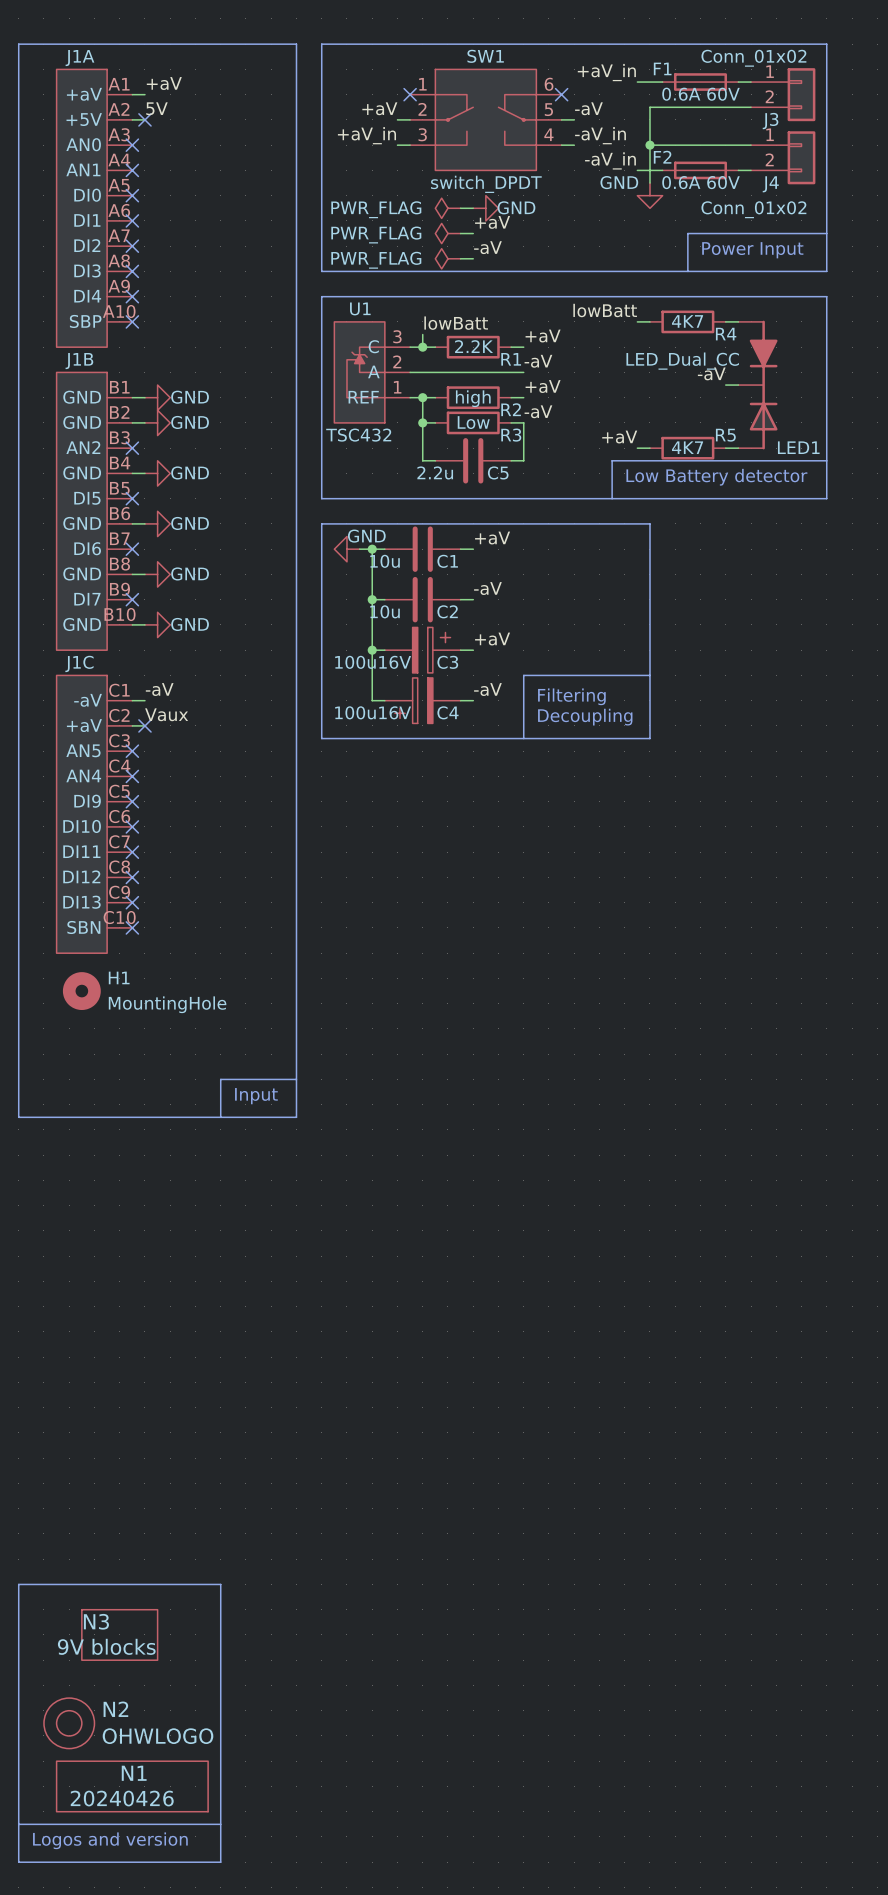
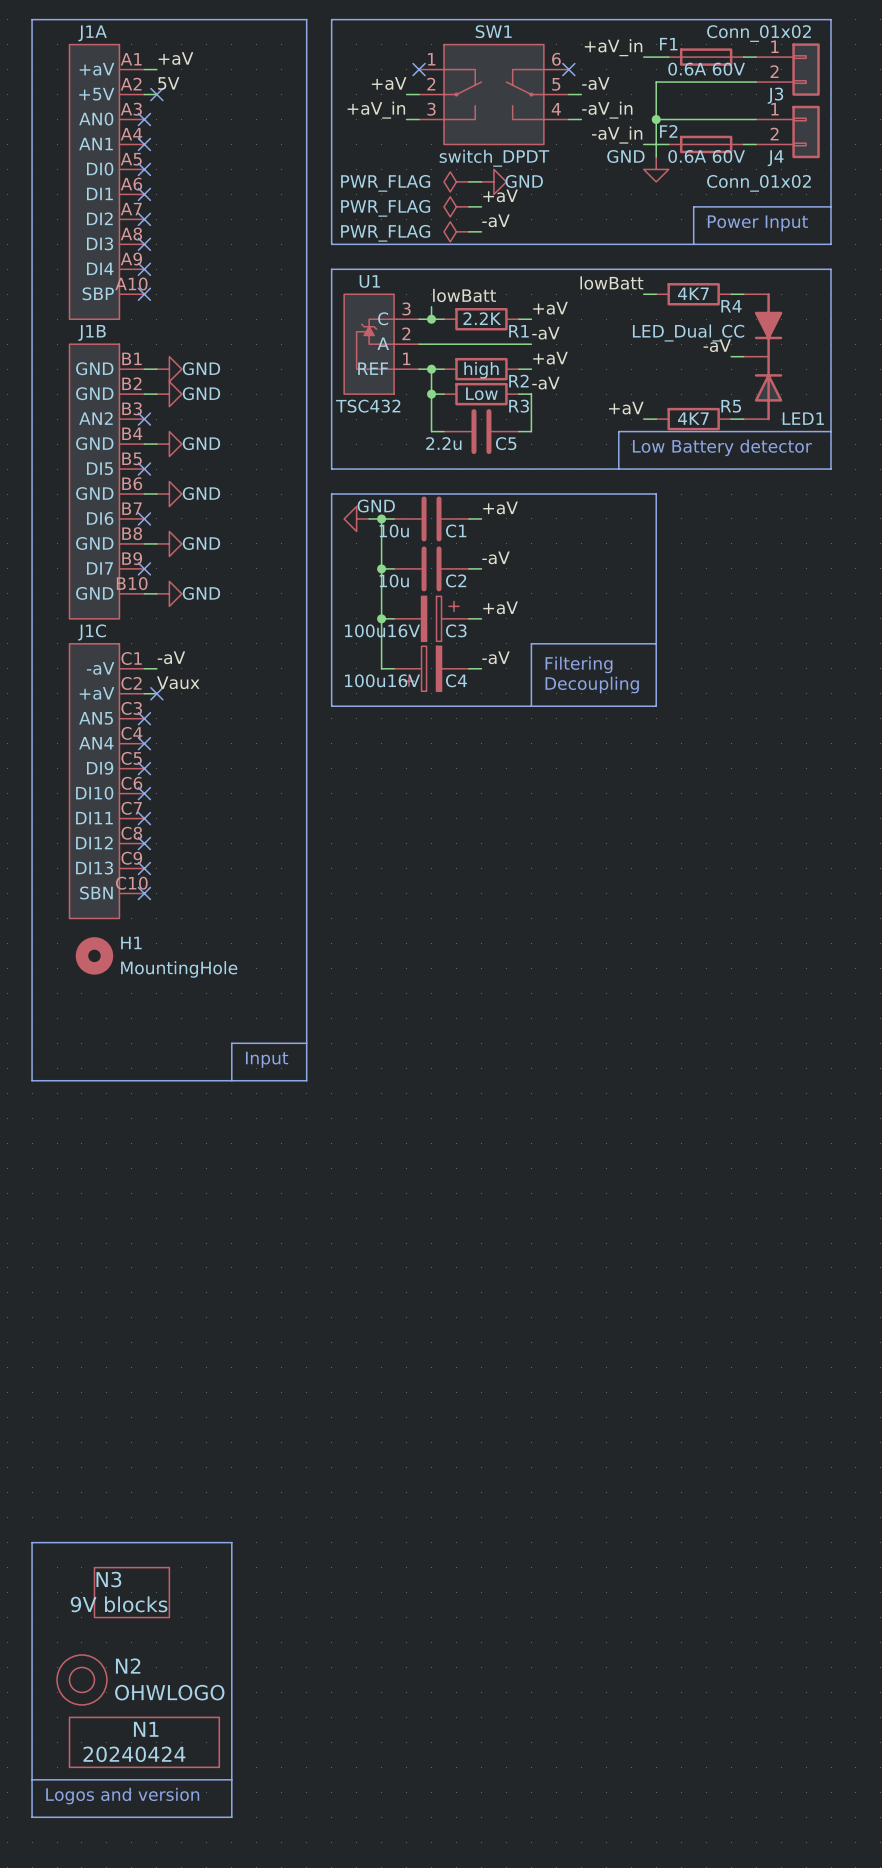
N1 value: 20240426 (122, 1798) -> 20240424 (134, 1754)

